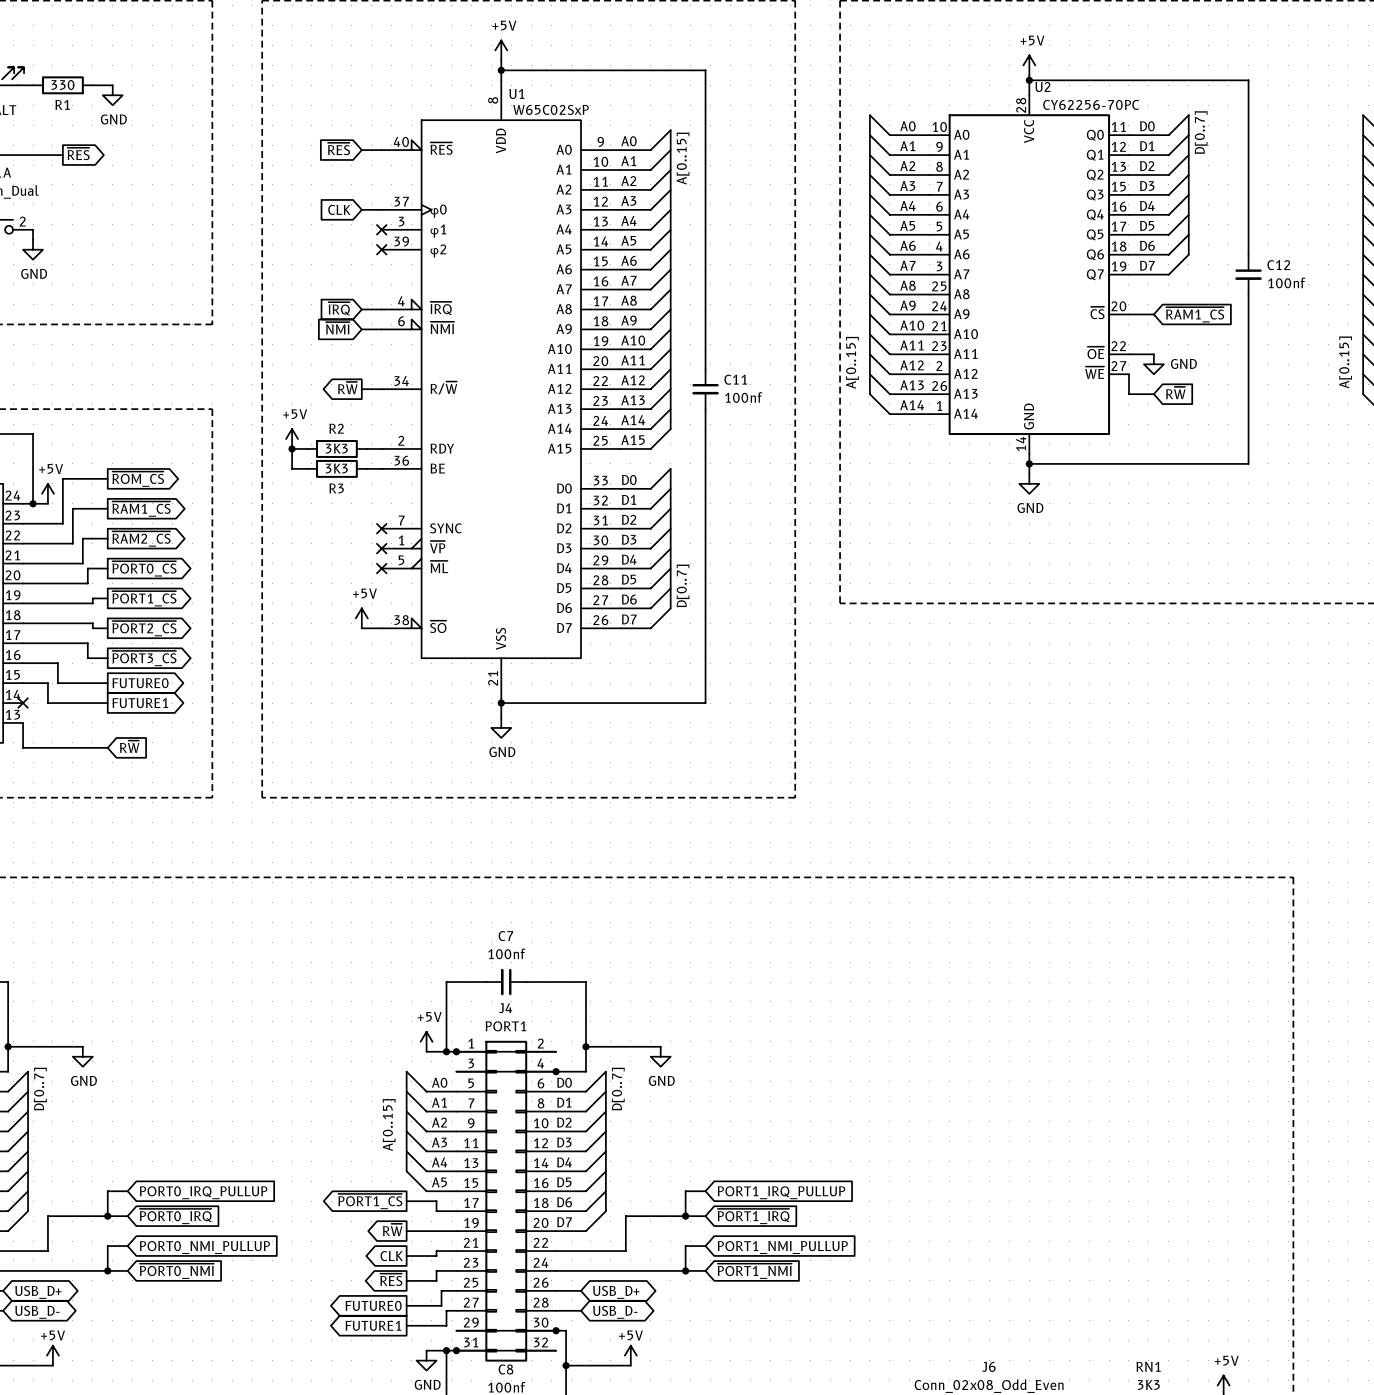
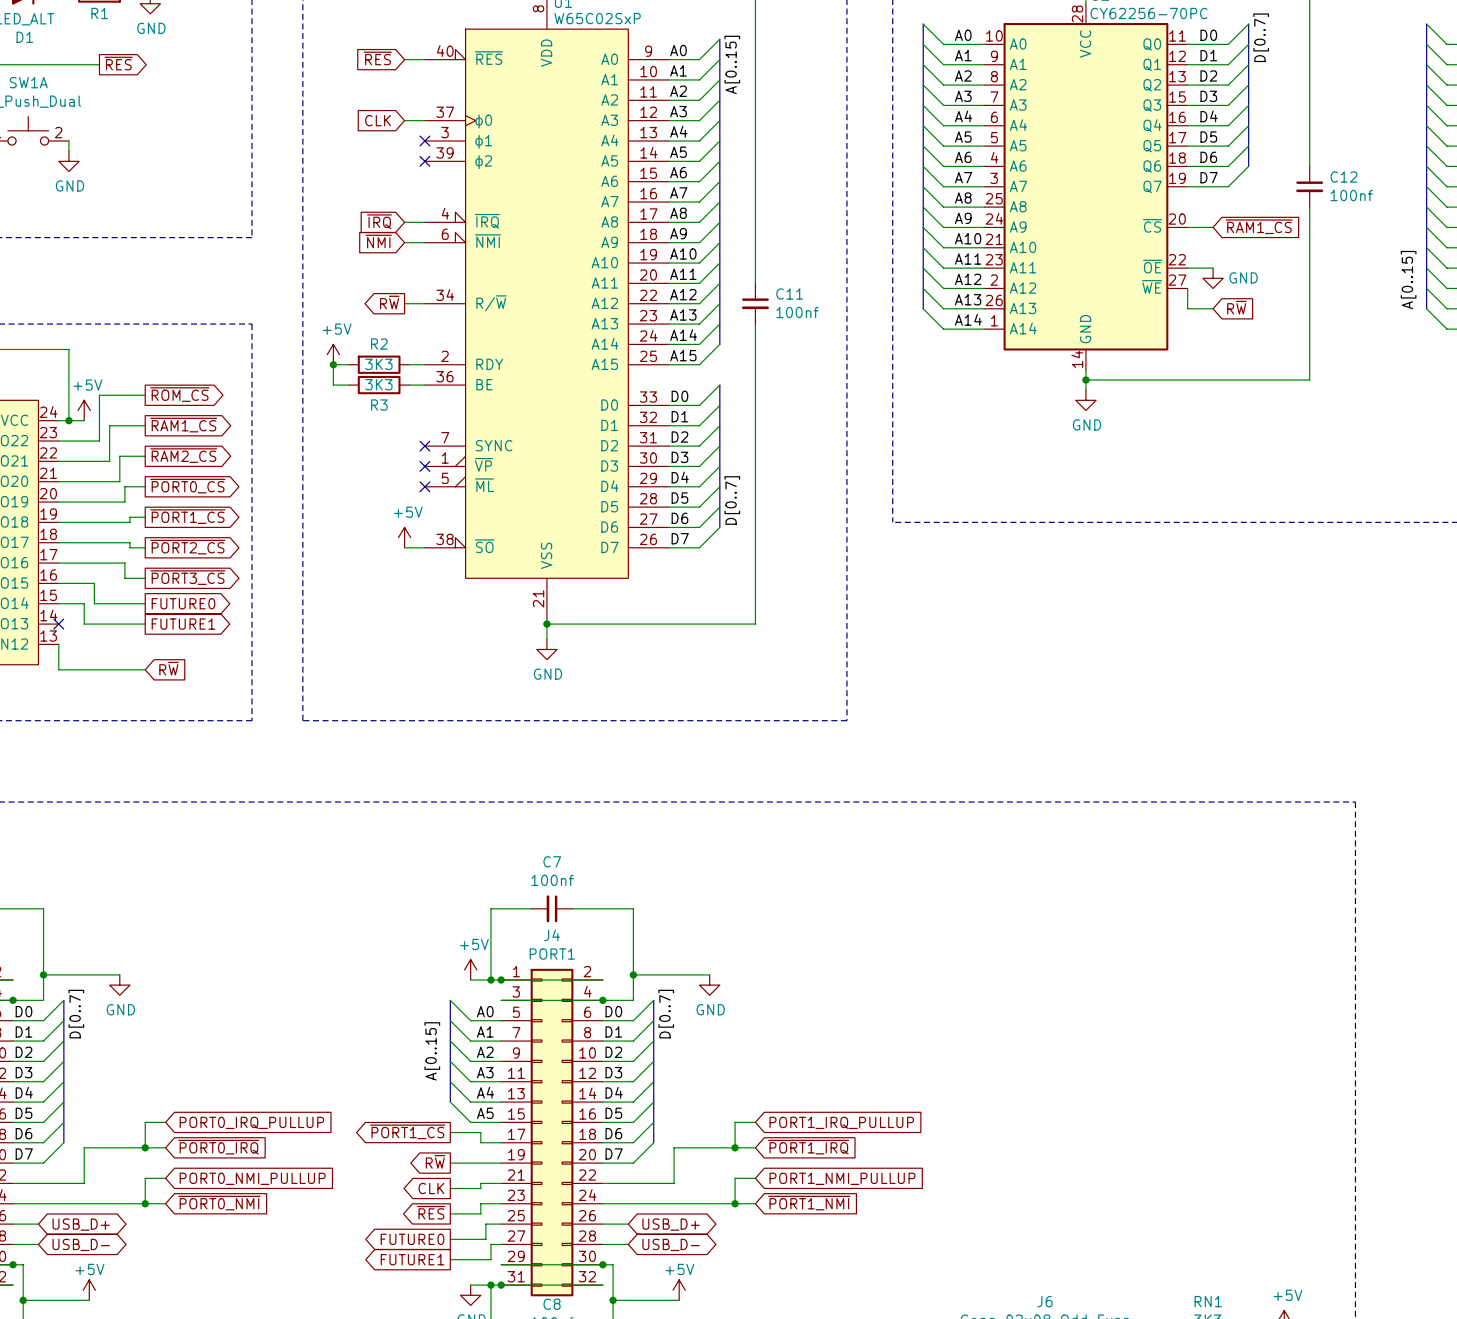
label: A[0..15] (852, 362) -> none

